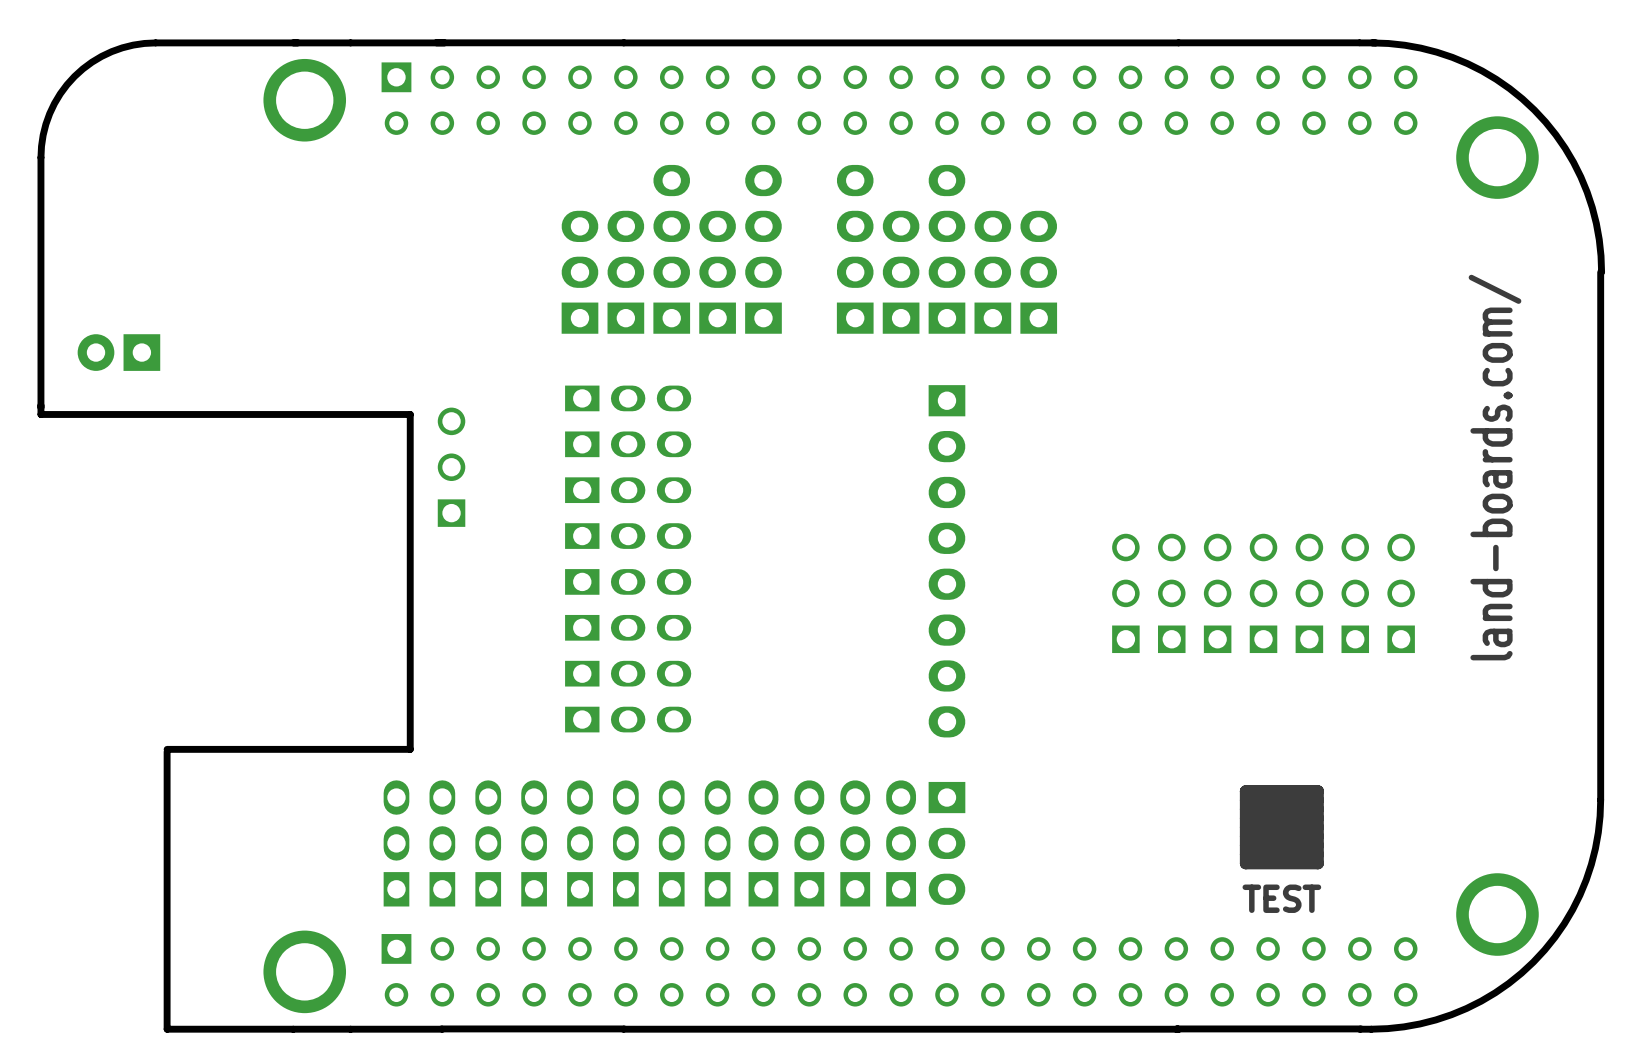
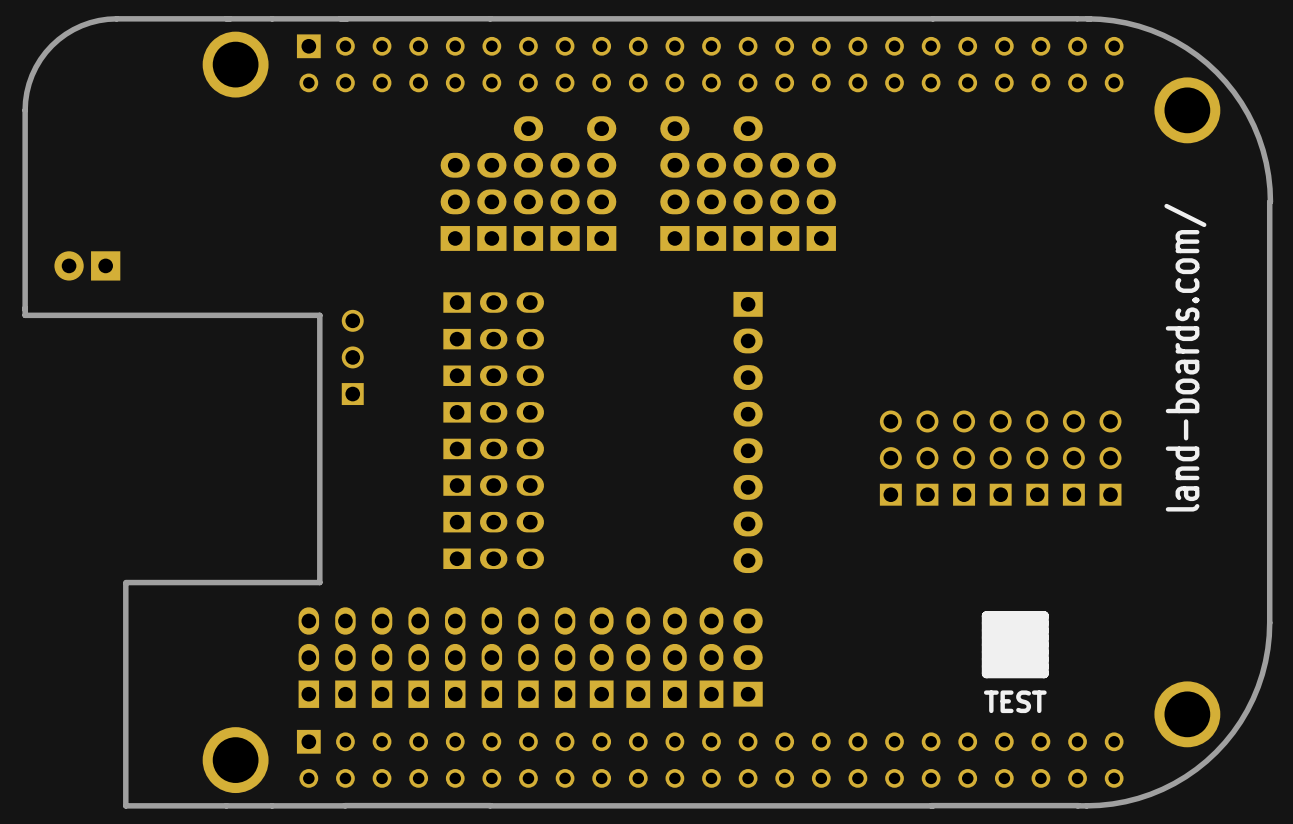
part rotation: 0° (946, 843) -> 180° (748, 657)

